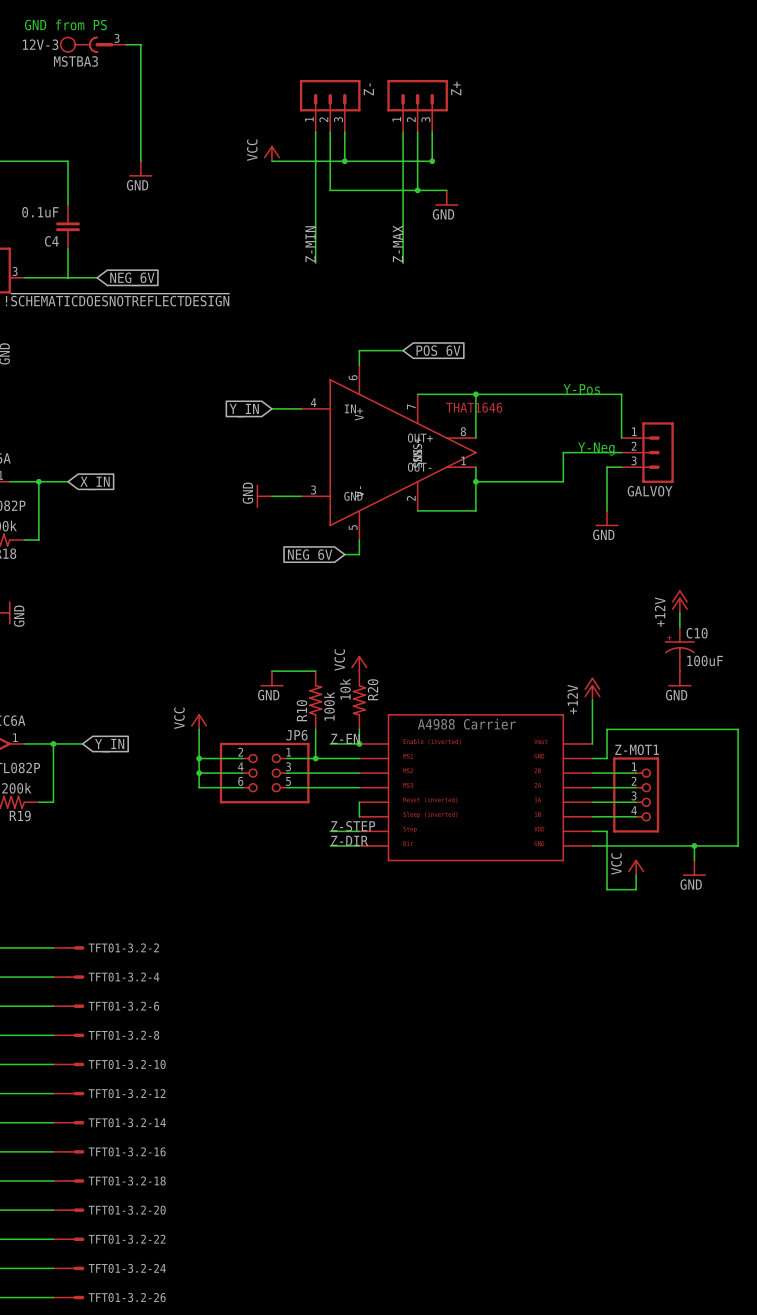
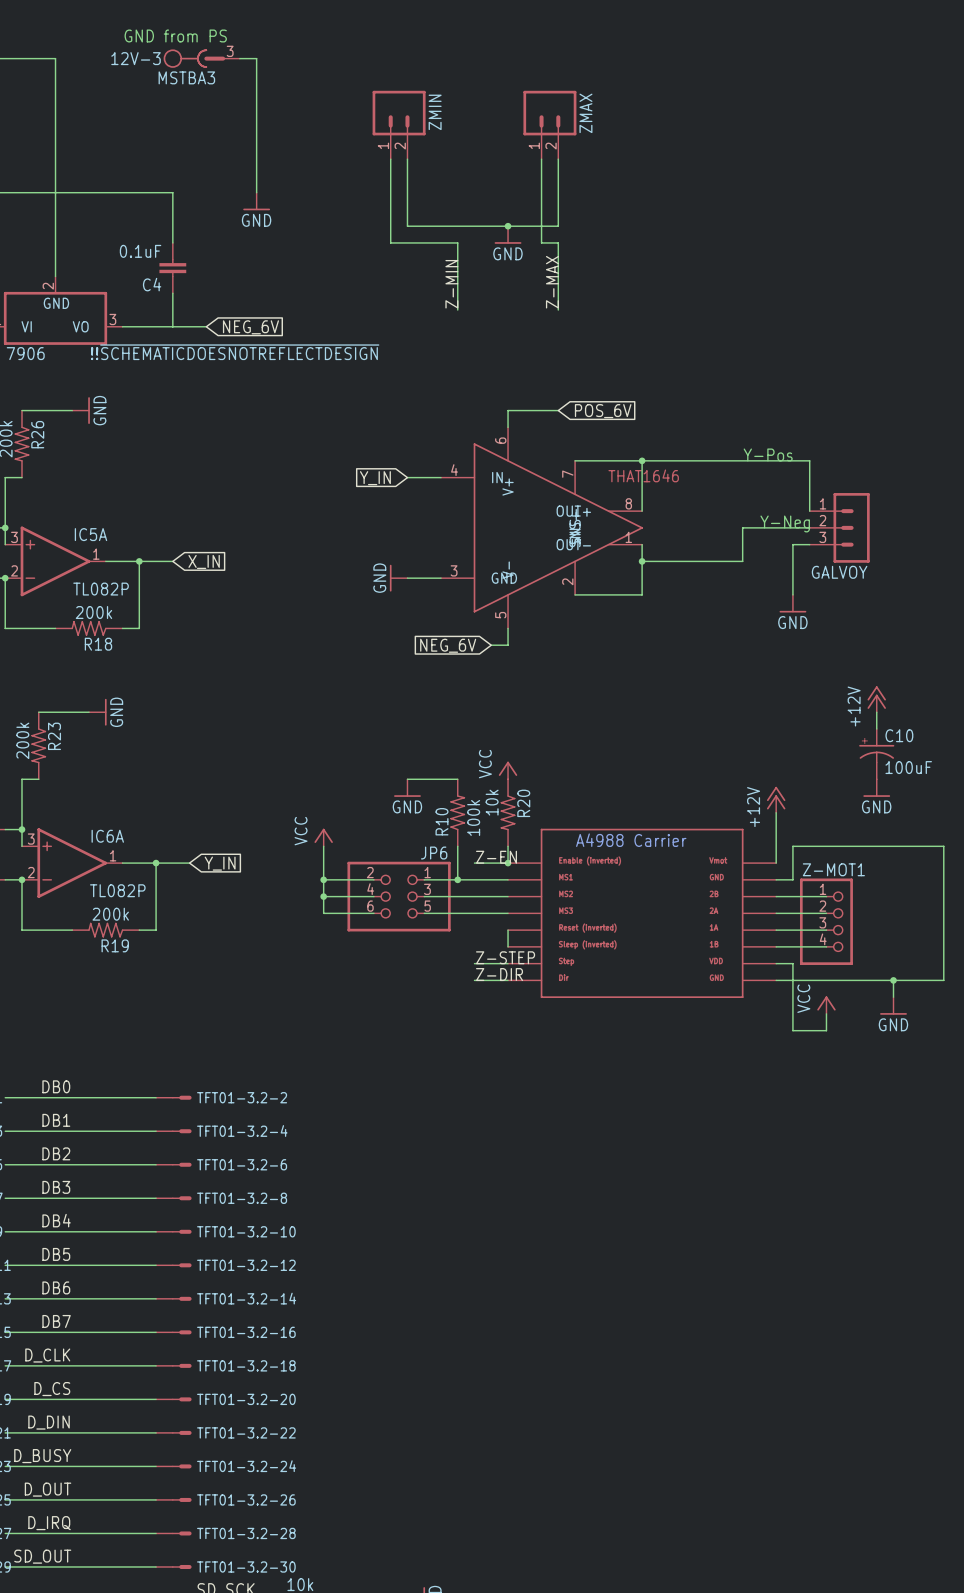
ZMIN: none -> (399, 124)
ZMAX: none -> (549, 124)
Z-: (330, 106) -> none
Z+: (417, 106) -> none
wire: (315, 132) (315, 204) -> (390, 159) (390, 242) (457, 242)
wire: (330, 132) (330, 190) -> (407, 159) (407, 226) (474, 226)
wire: (344, 132) (344, 161) -> none
wire: (417, 132) (417, 190) -> none
wire: (432, 132) (432, 161) (271, 161) -> none
power symbol: VCC (271, 153) -> none
junction: (344, 161) -> none
junction: (432, 161) -> none
junction: none -> (508, 226)
junction: (417, 190) -> none
wire: (446, 190) (403, 190) (403, 204) -> (541, 159) (541, 242) (558, 242)
power symbol position: GND (446, 198) -> GND (508, 235)

